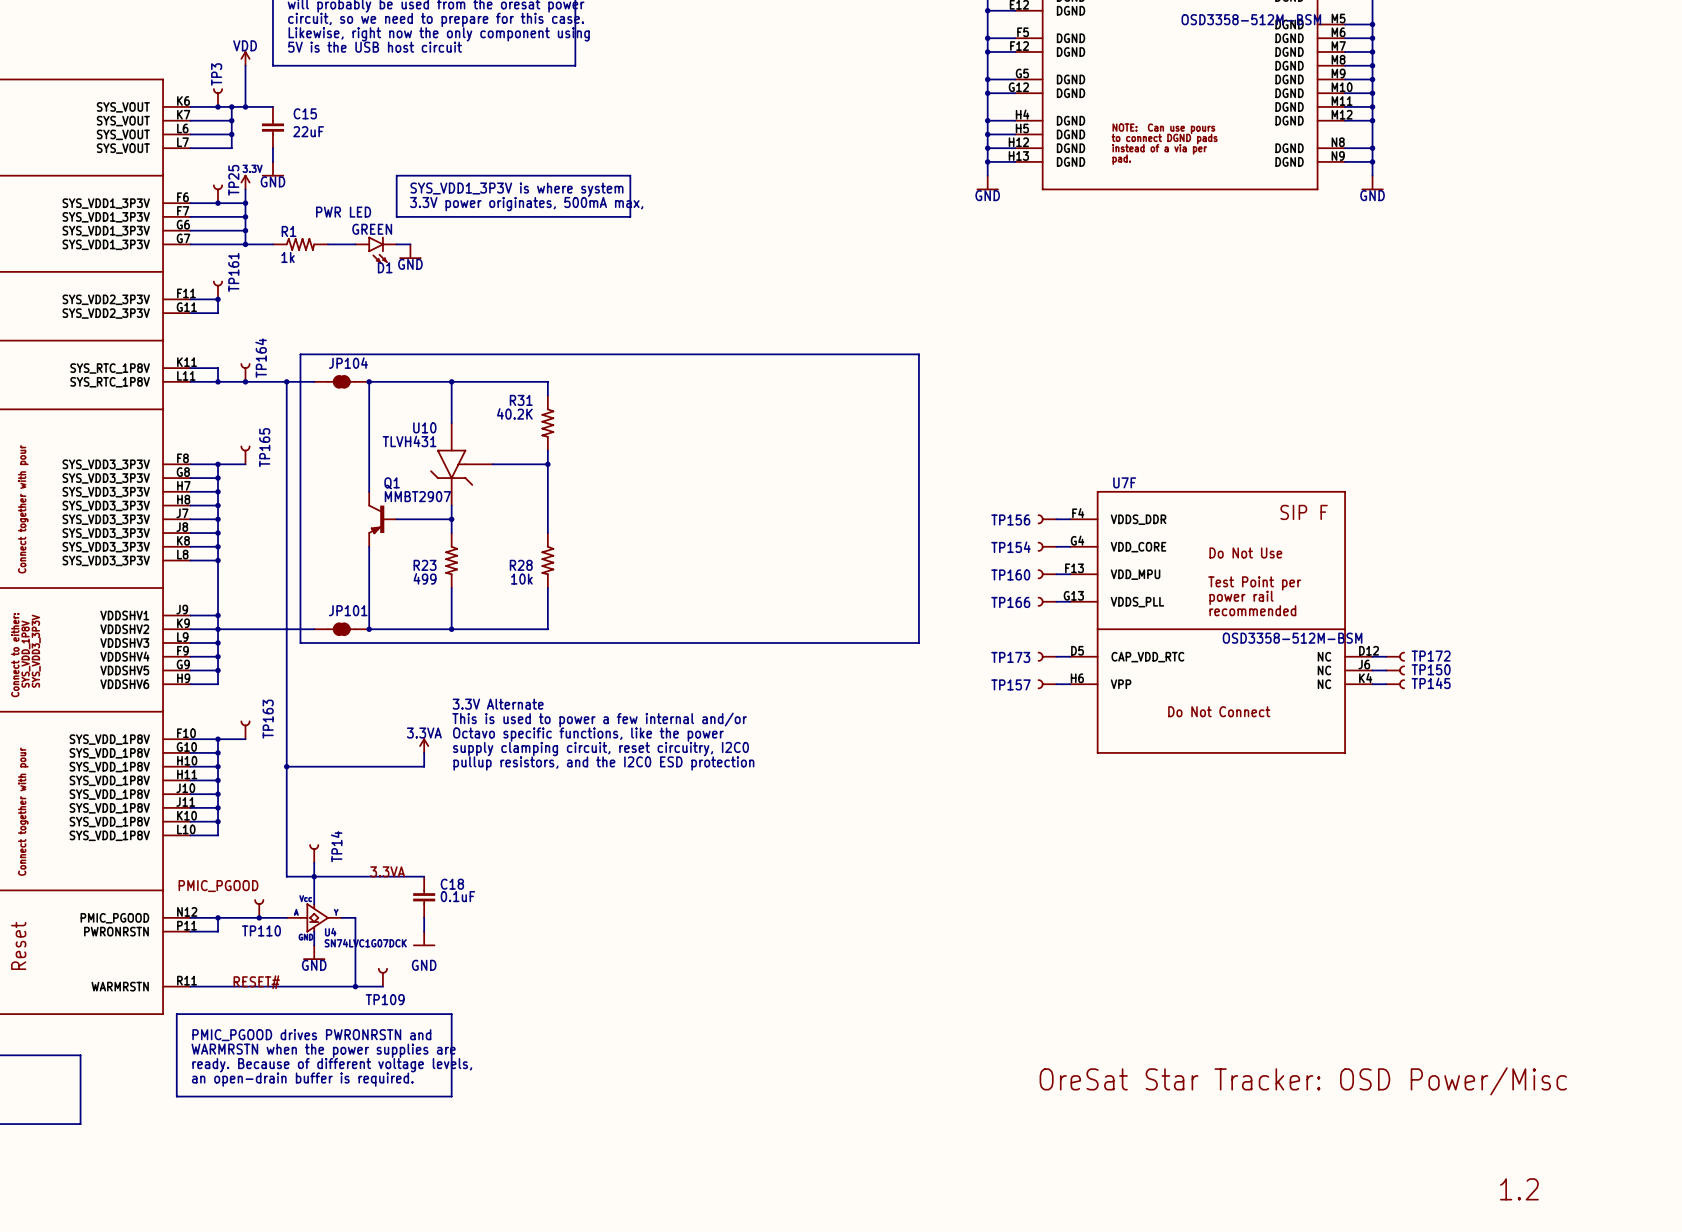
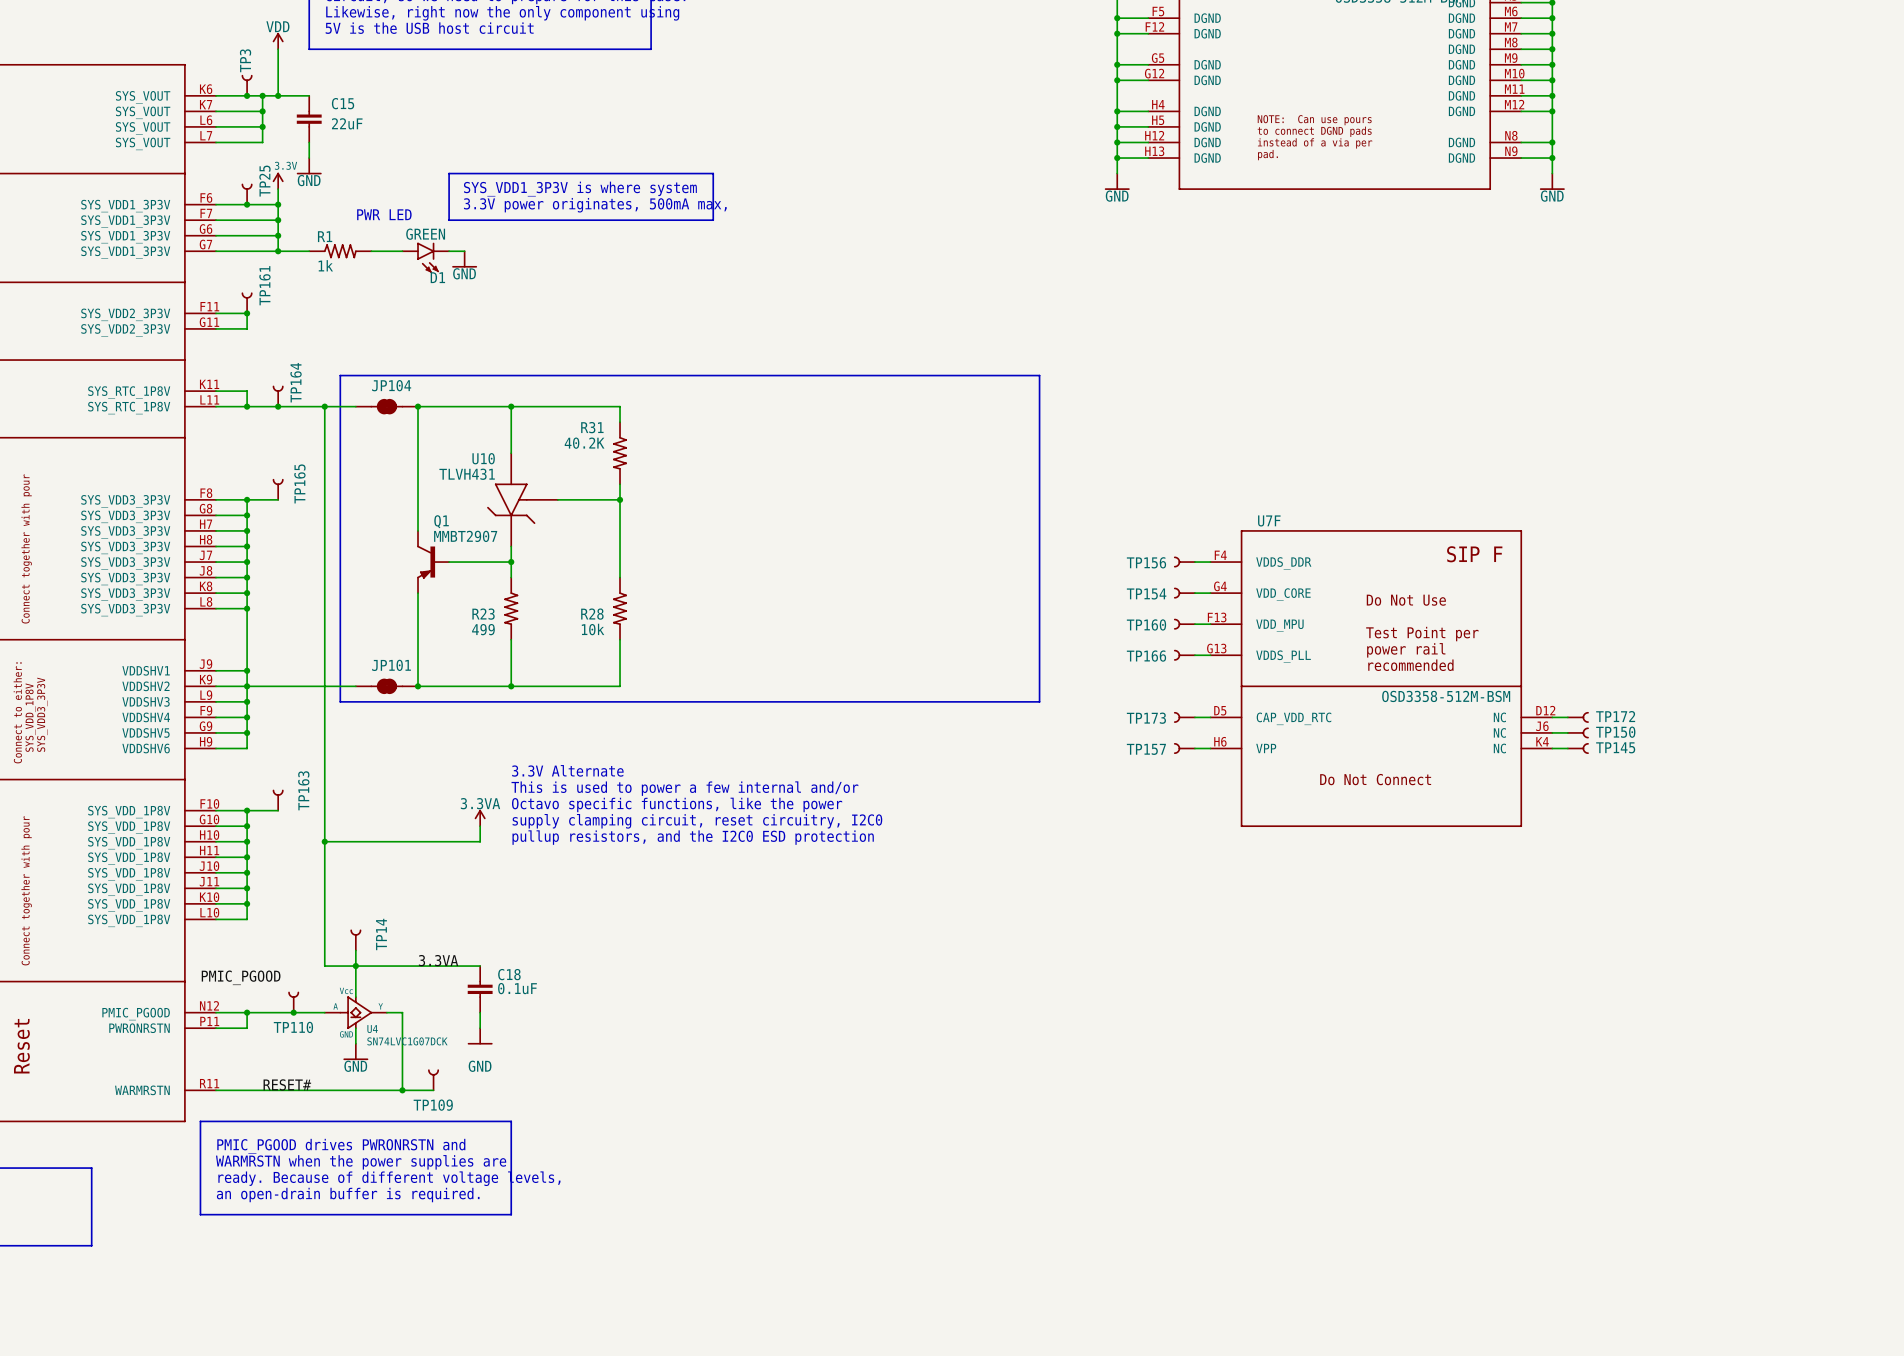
text: OreSat Star Tracker: OSD Power/Misc (1303, 1081) -> none
text: 1.2 (1519, 1189) -> none

